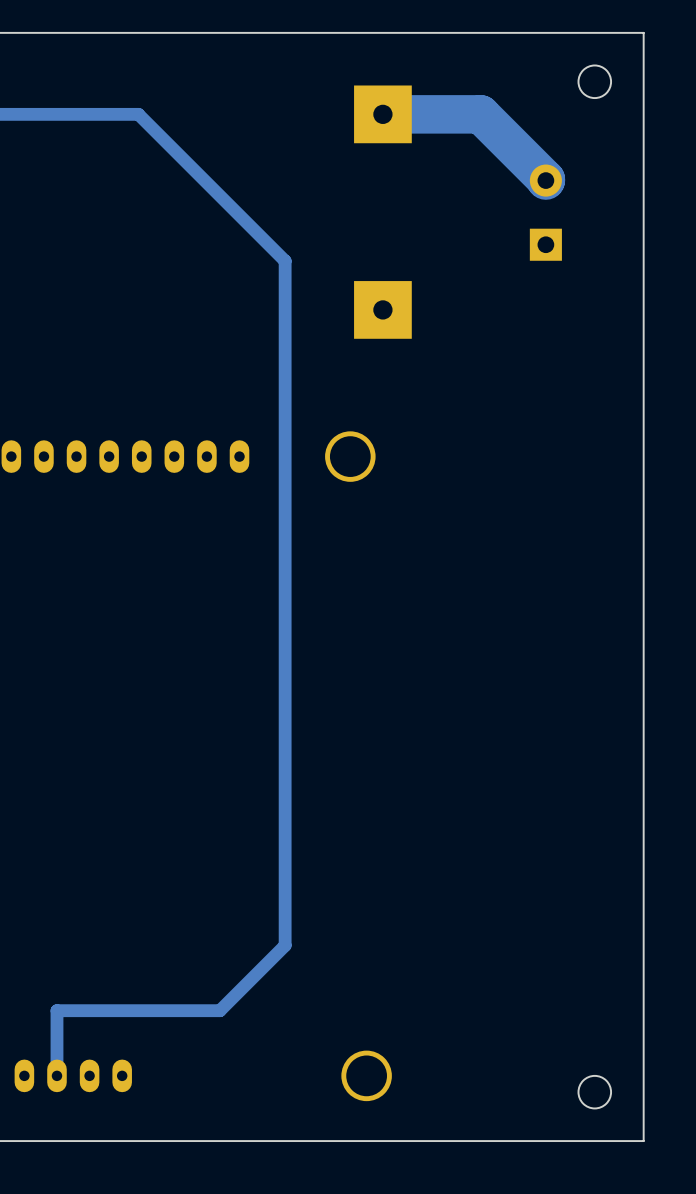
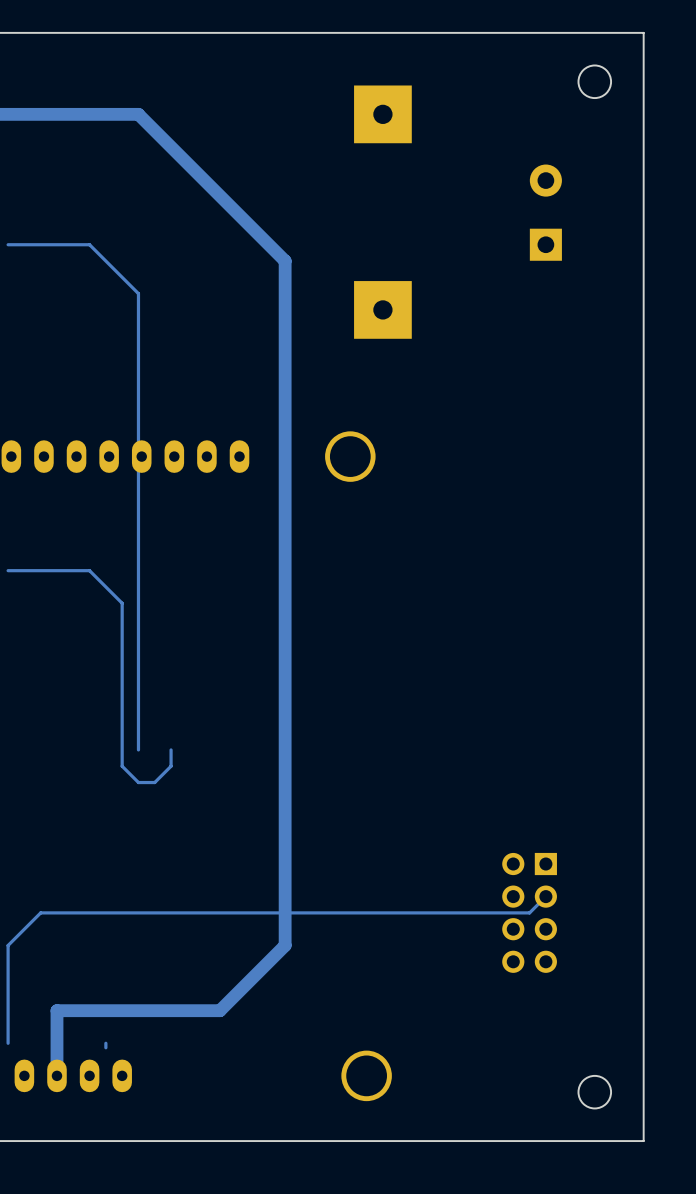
track: (382, 114) (480, 114) (545, 180) -> none
track: none -> (8, 244) (89, 244) (138, 293) (138, 749)
track: none -> (8, 570) (89, 570) (122, 603) (122, 766) (138, 782) (154, 782) (171, 766) (171, 749)
track: none -> (545, 896) (529, 912) (40, 912) (8, 945) (8, 1043)
part: none -> (529, 912)
track: none -> (105, 1043) (105, 1047)

